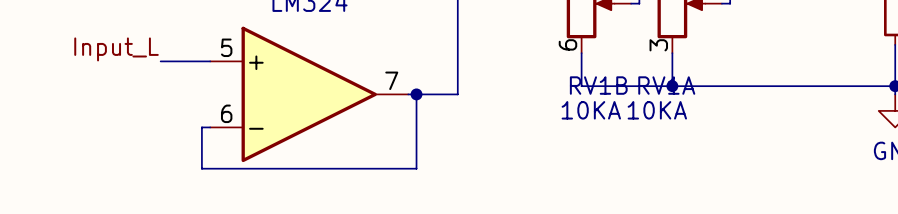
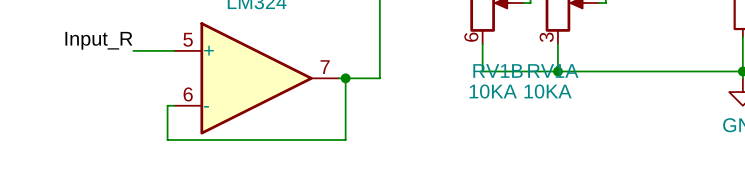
label: Input_L (116, 49) -> Input_R (98, 40)

